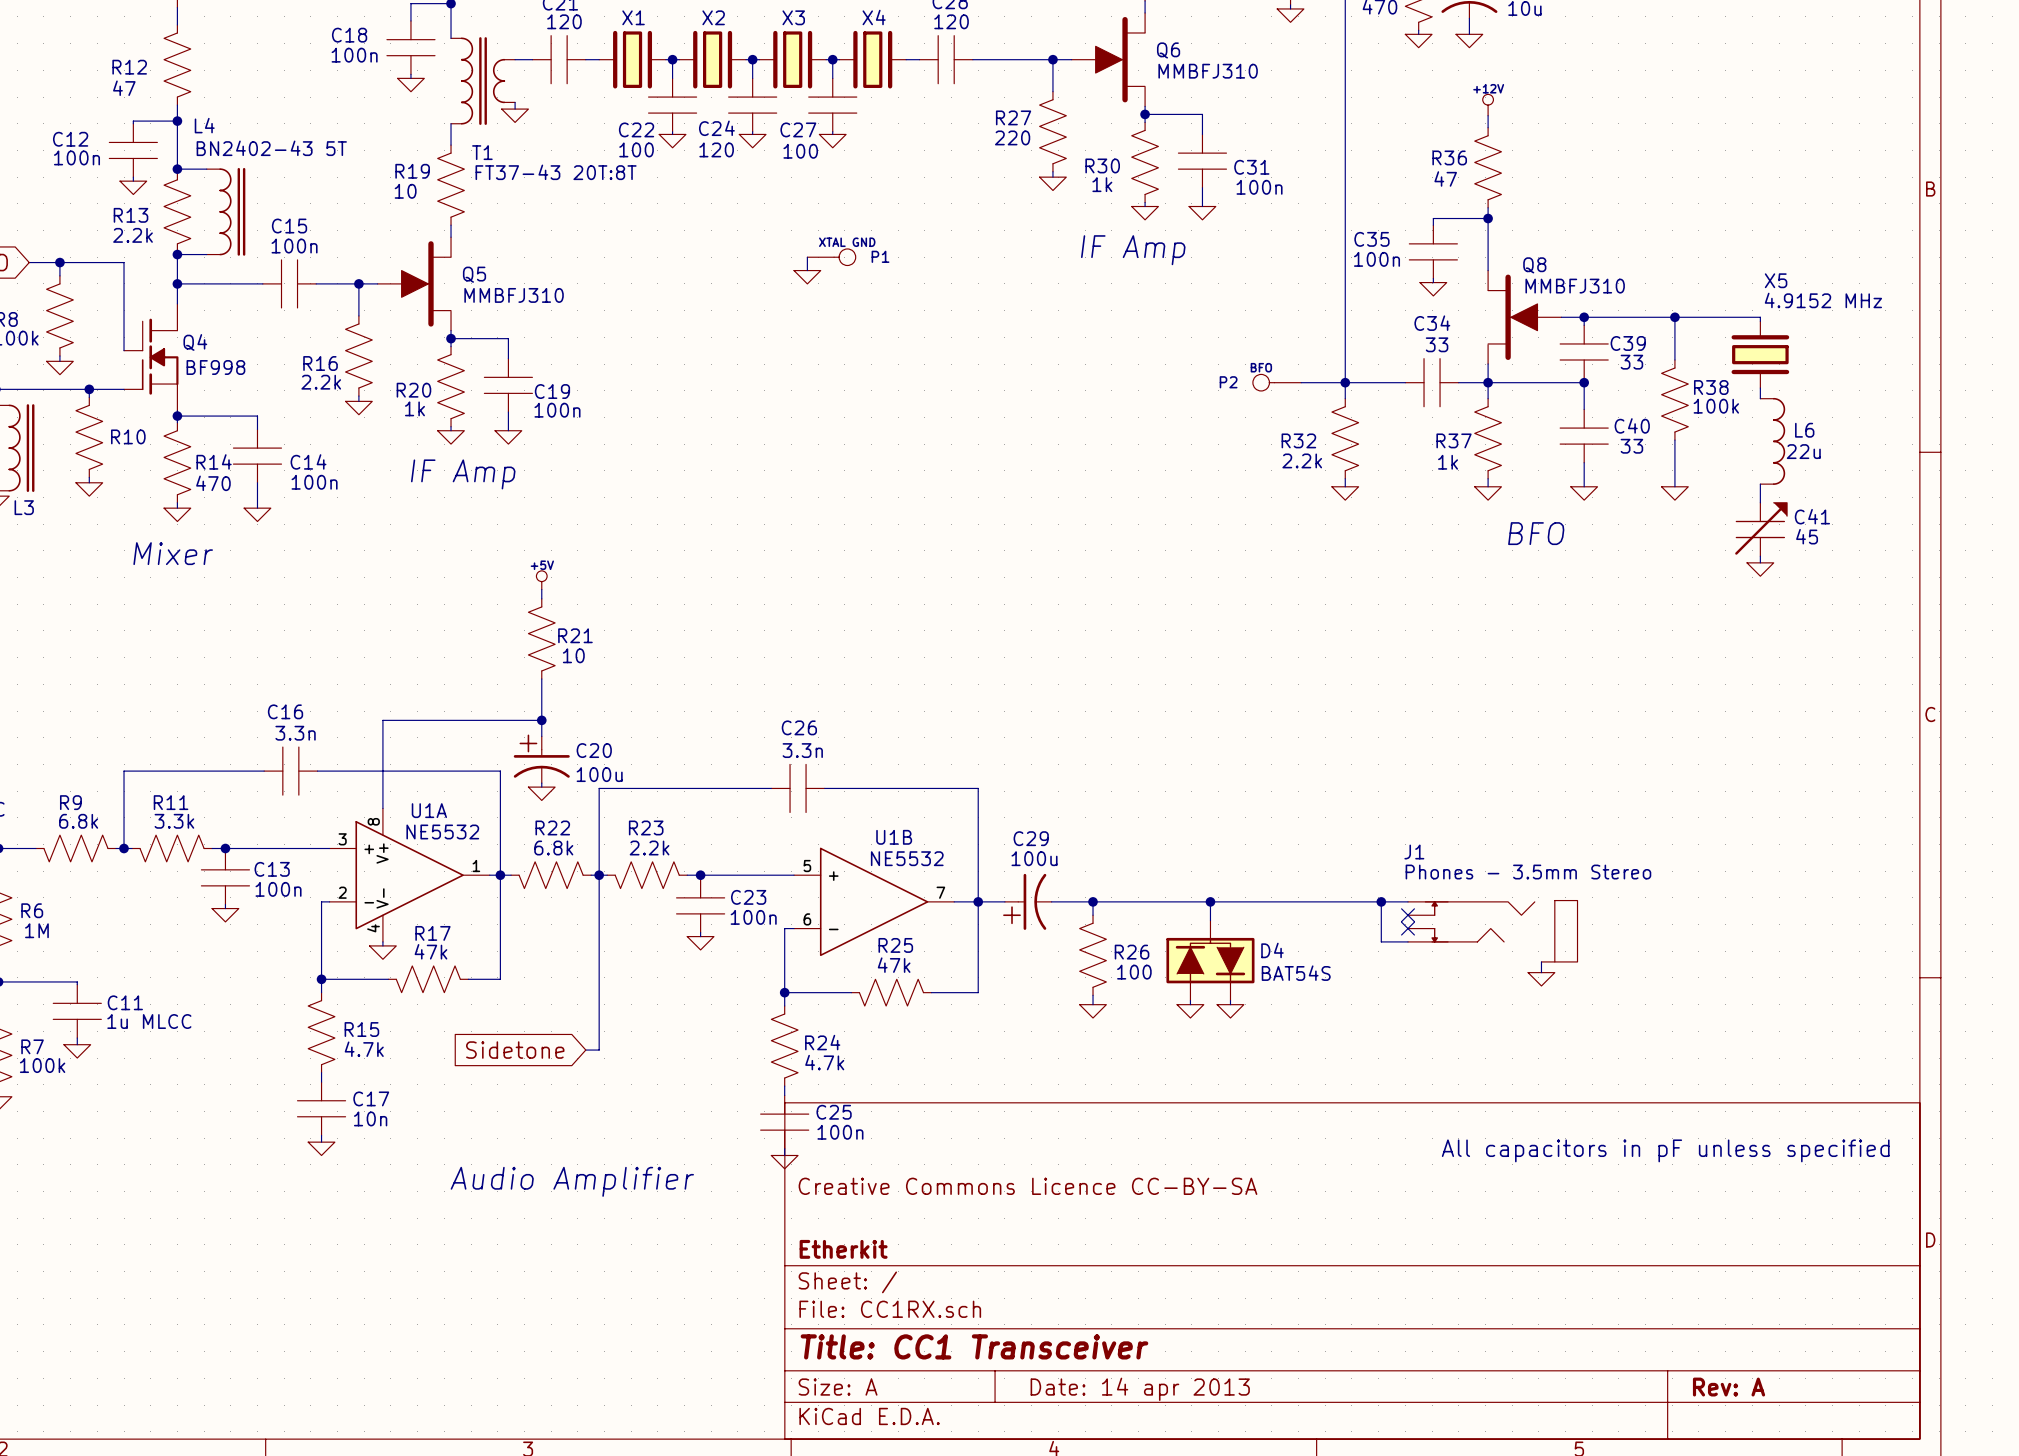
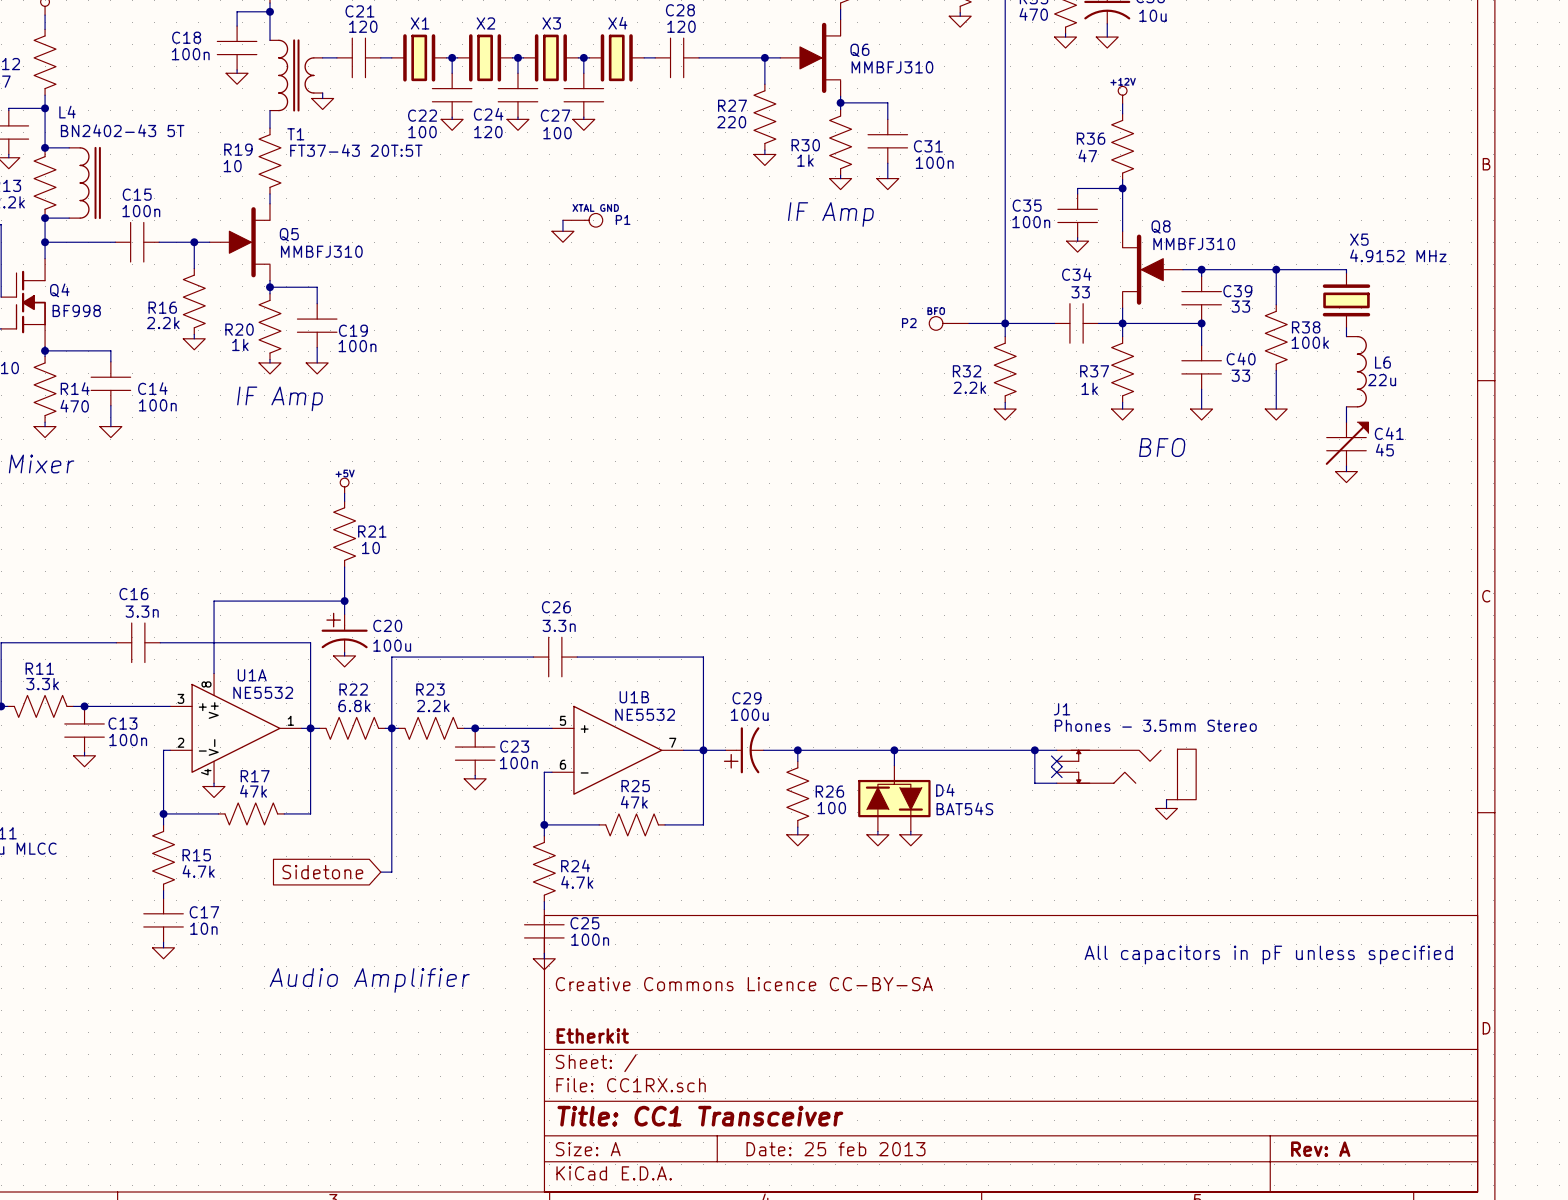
T1 value: FT37-43 20T:8T (556, 172) -> FT37-43 20T:5T (356, 150)
title block: Date: 14 apr 2013 (1140, 1389) -> Date: 25 feb 2013 (836, 1149)

